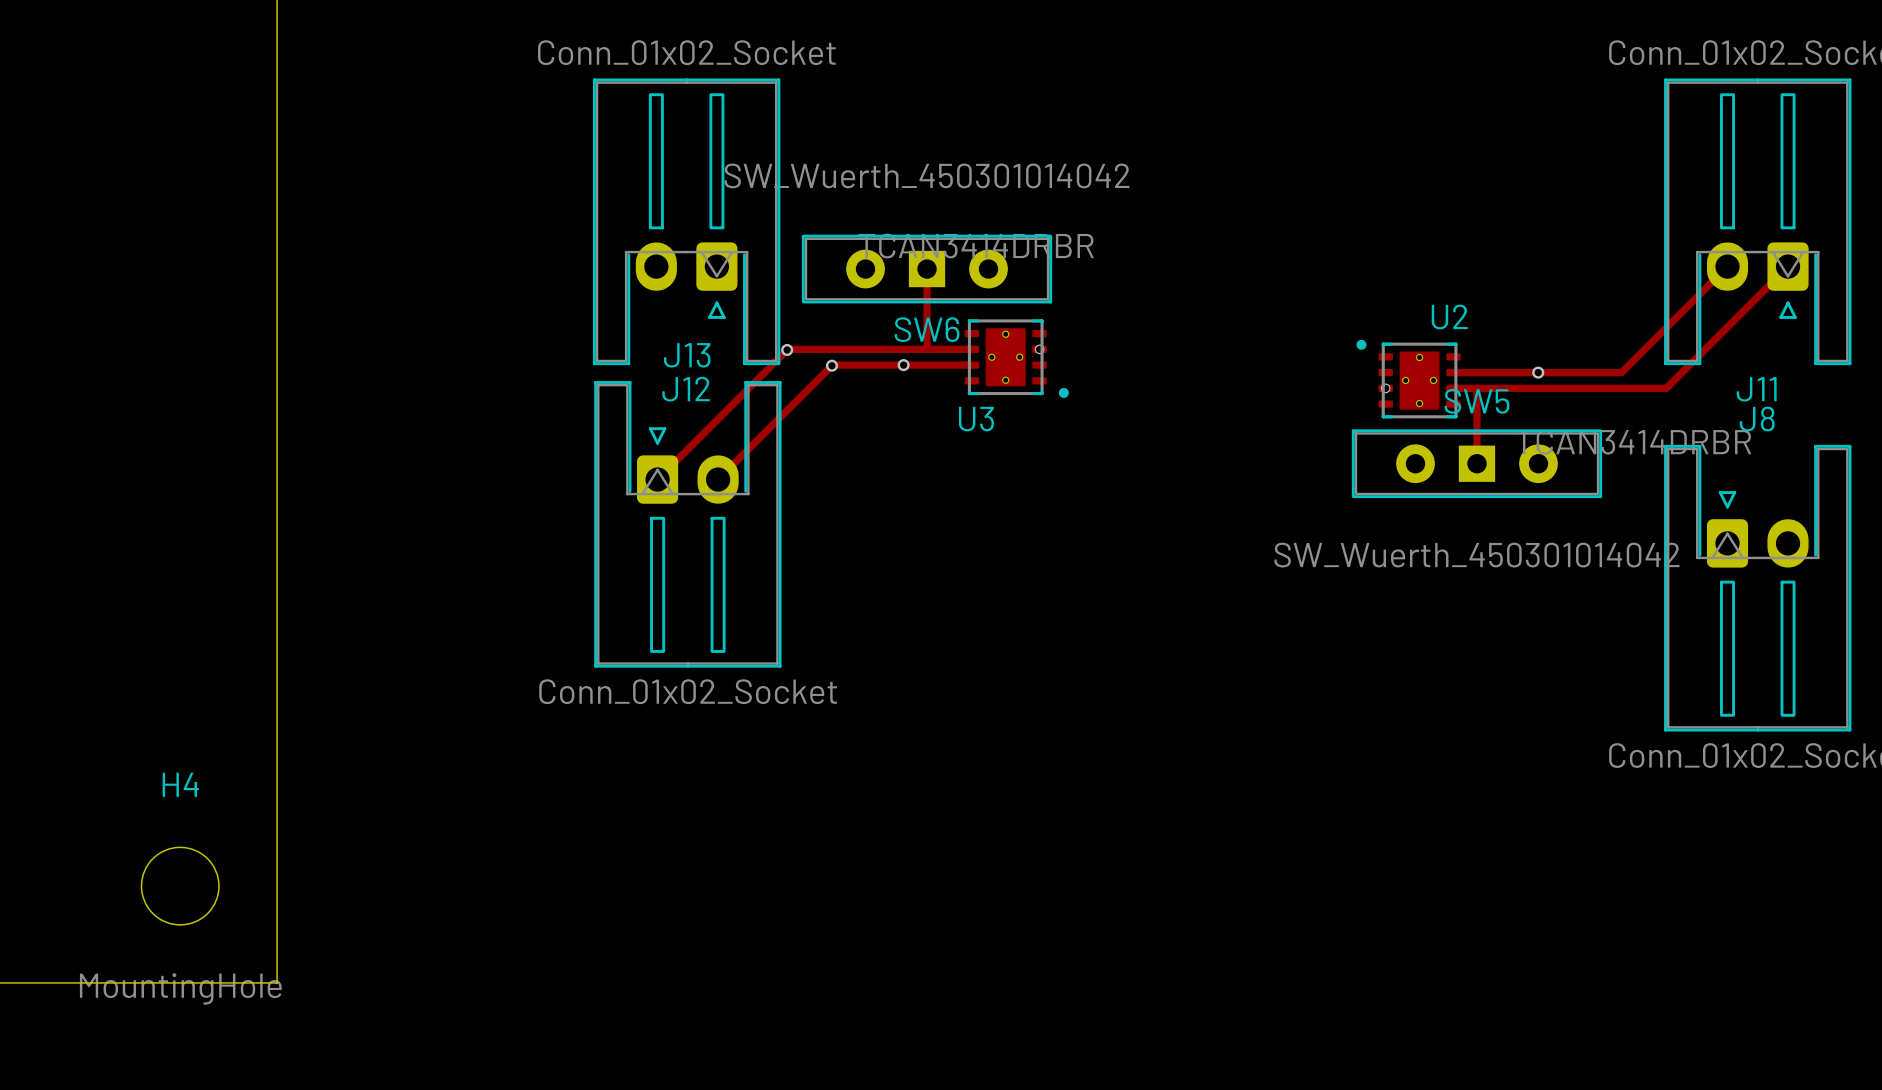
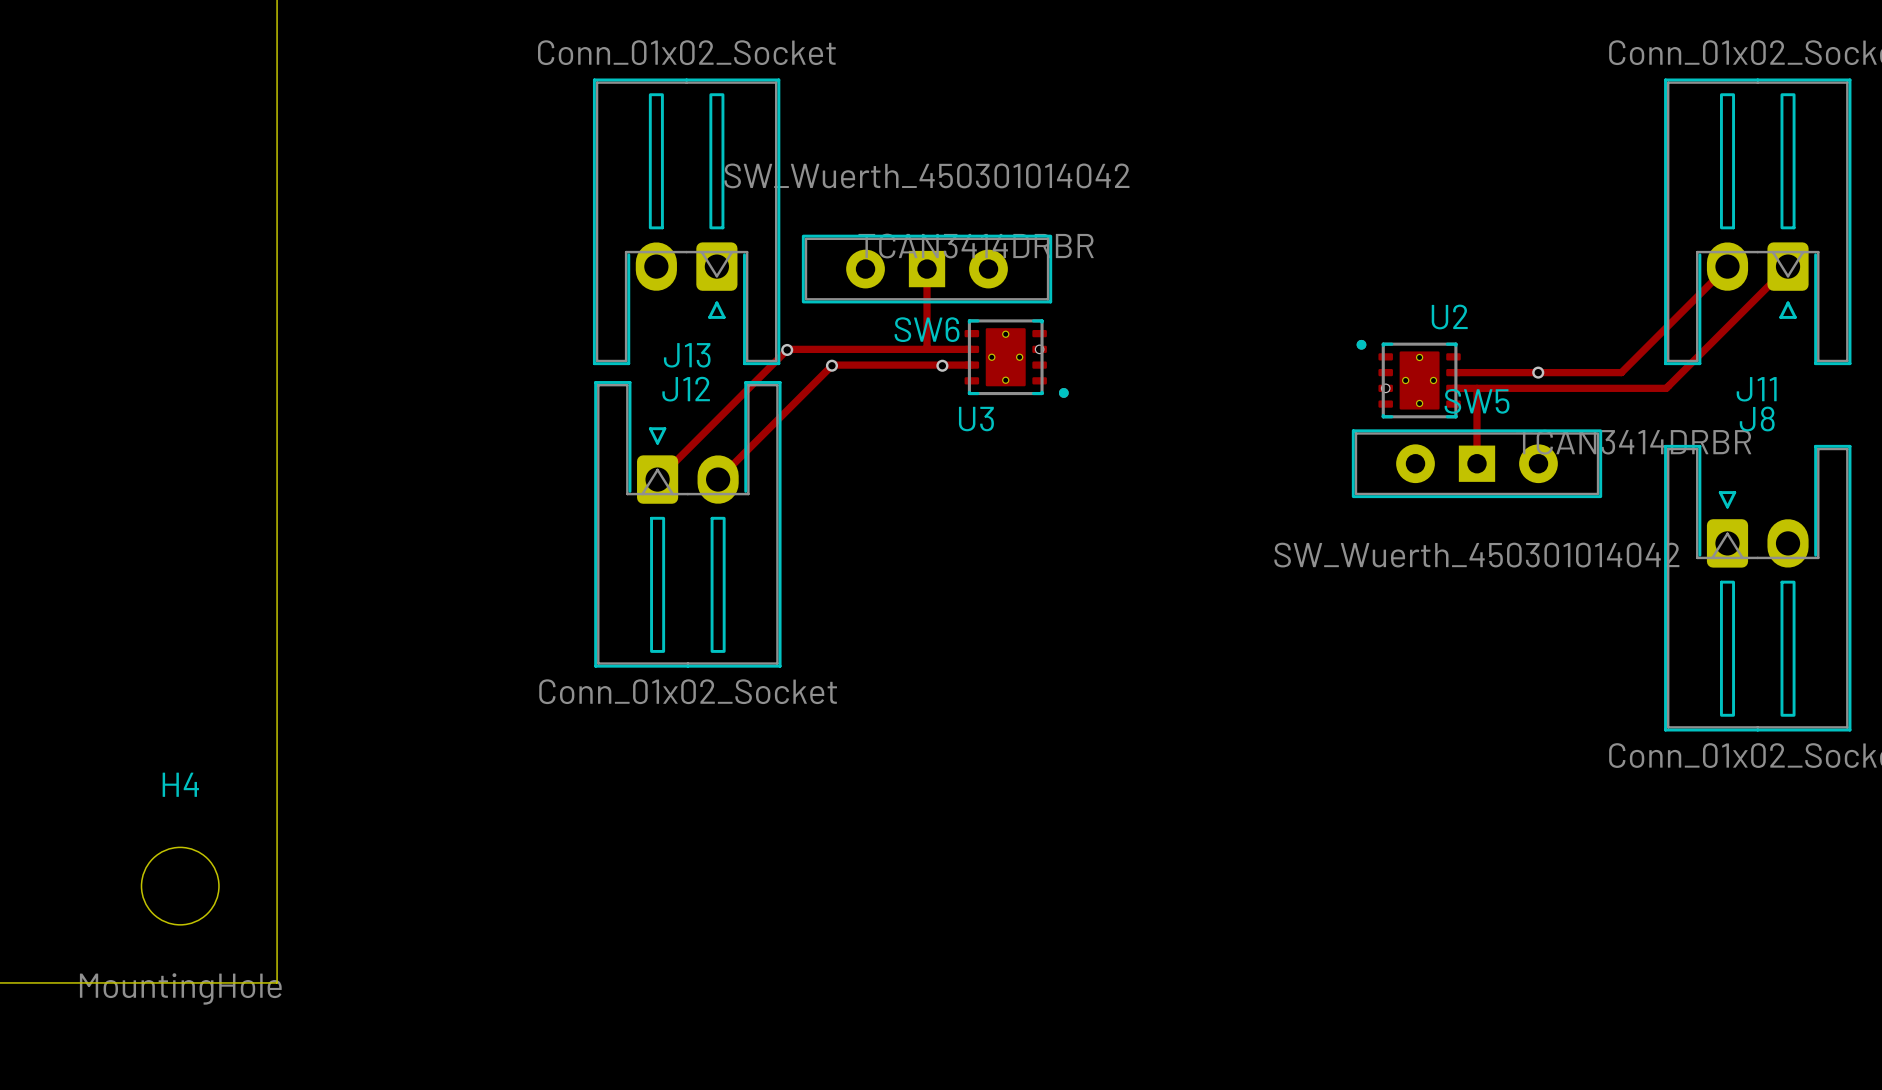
via position: (903, 365) -> (942, 365)

